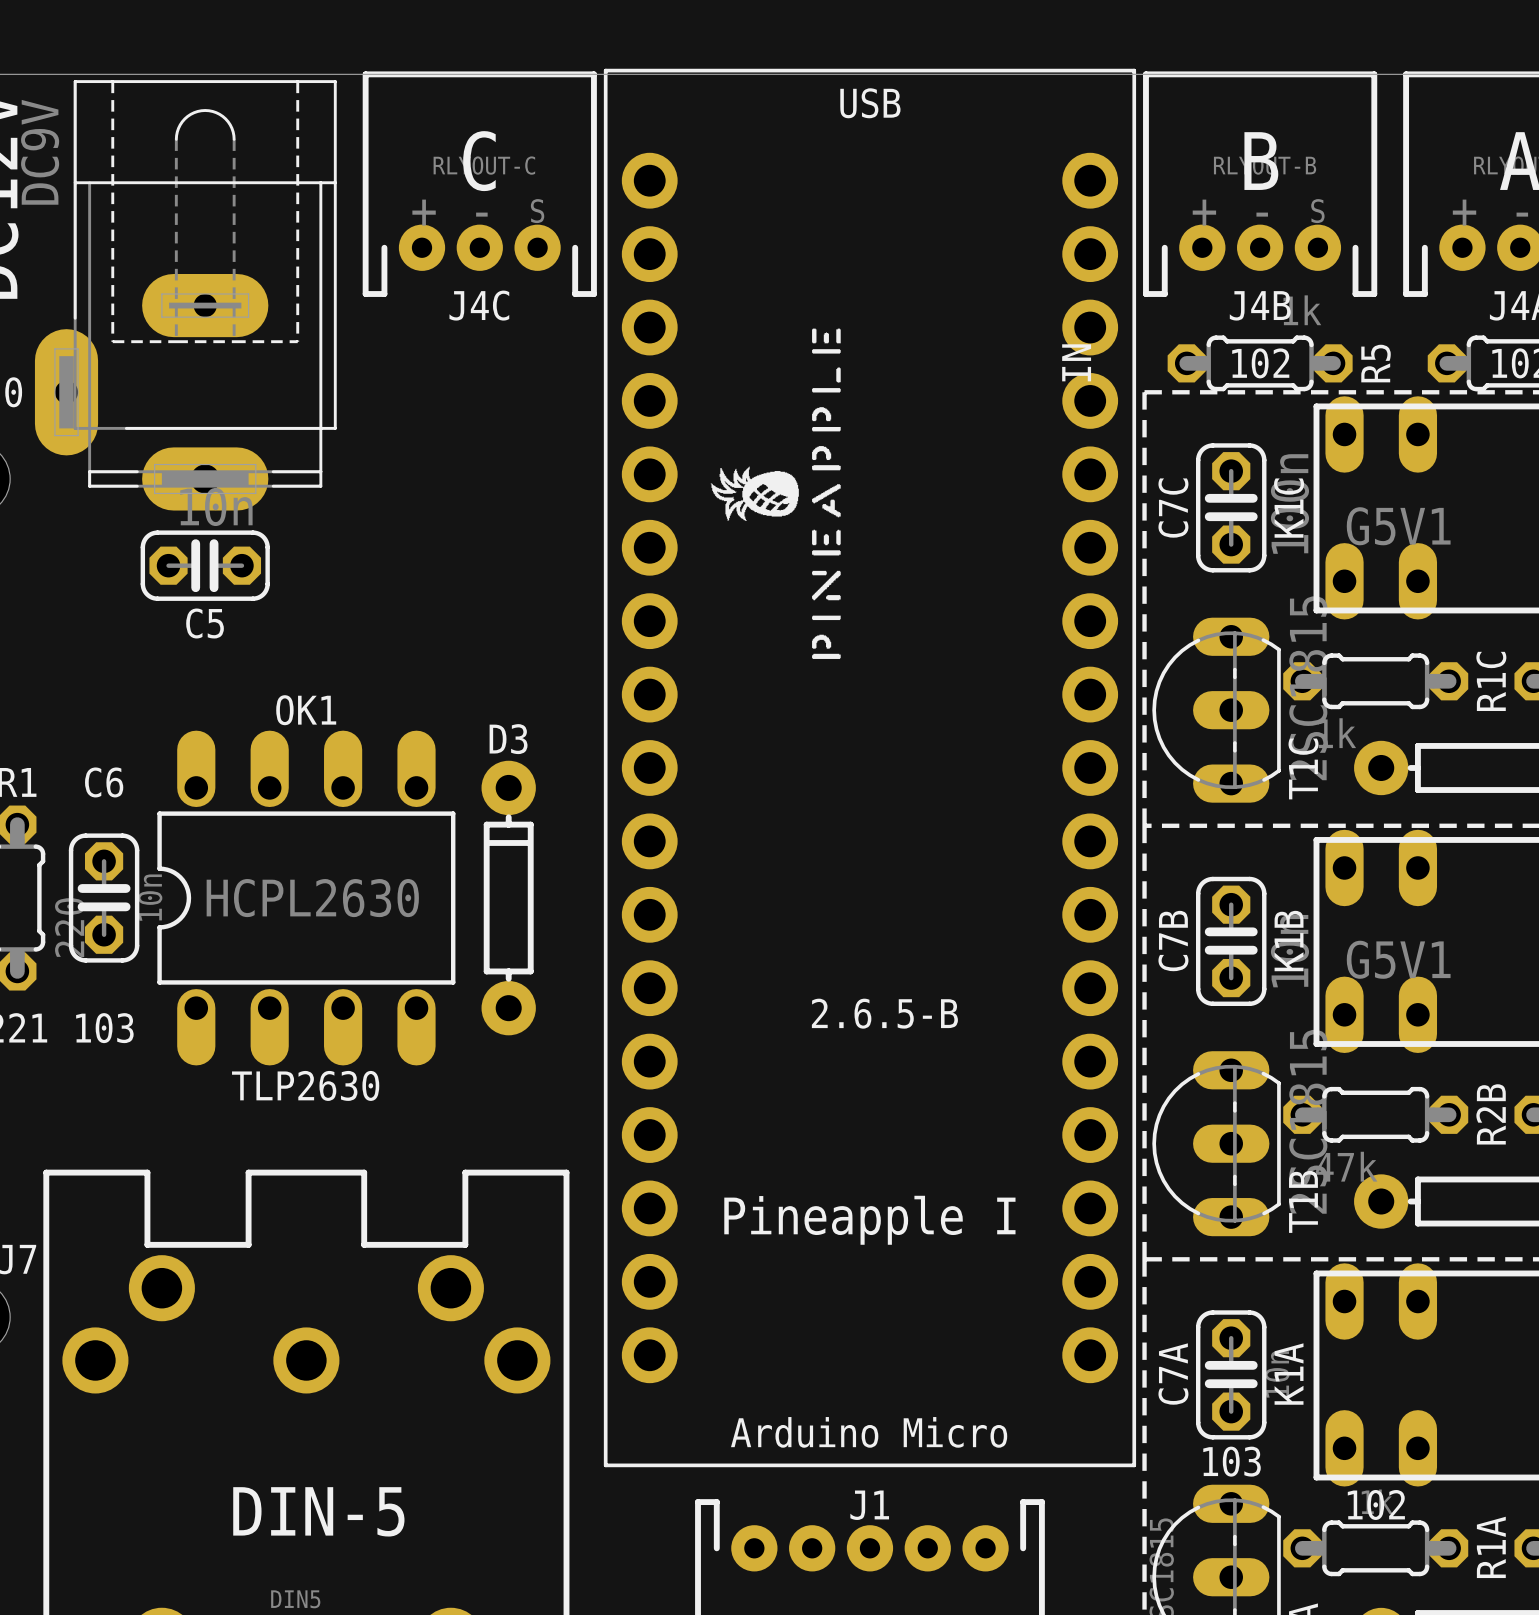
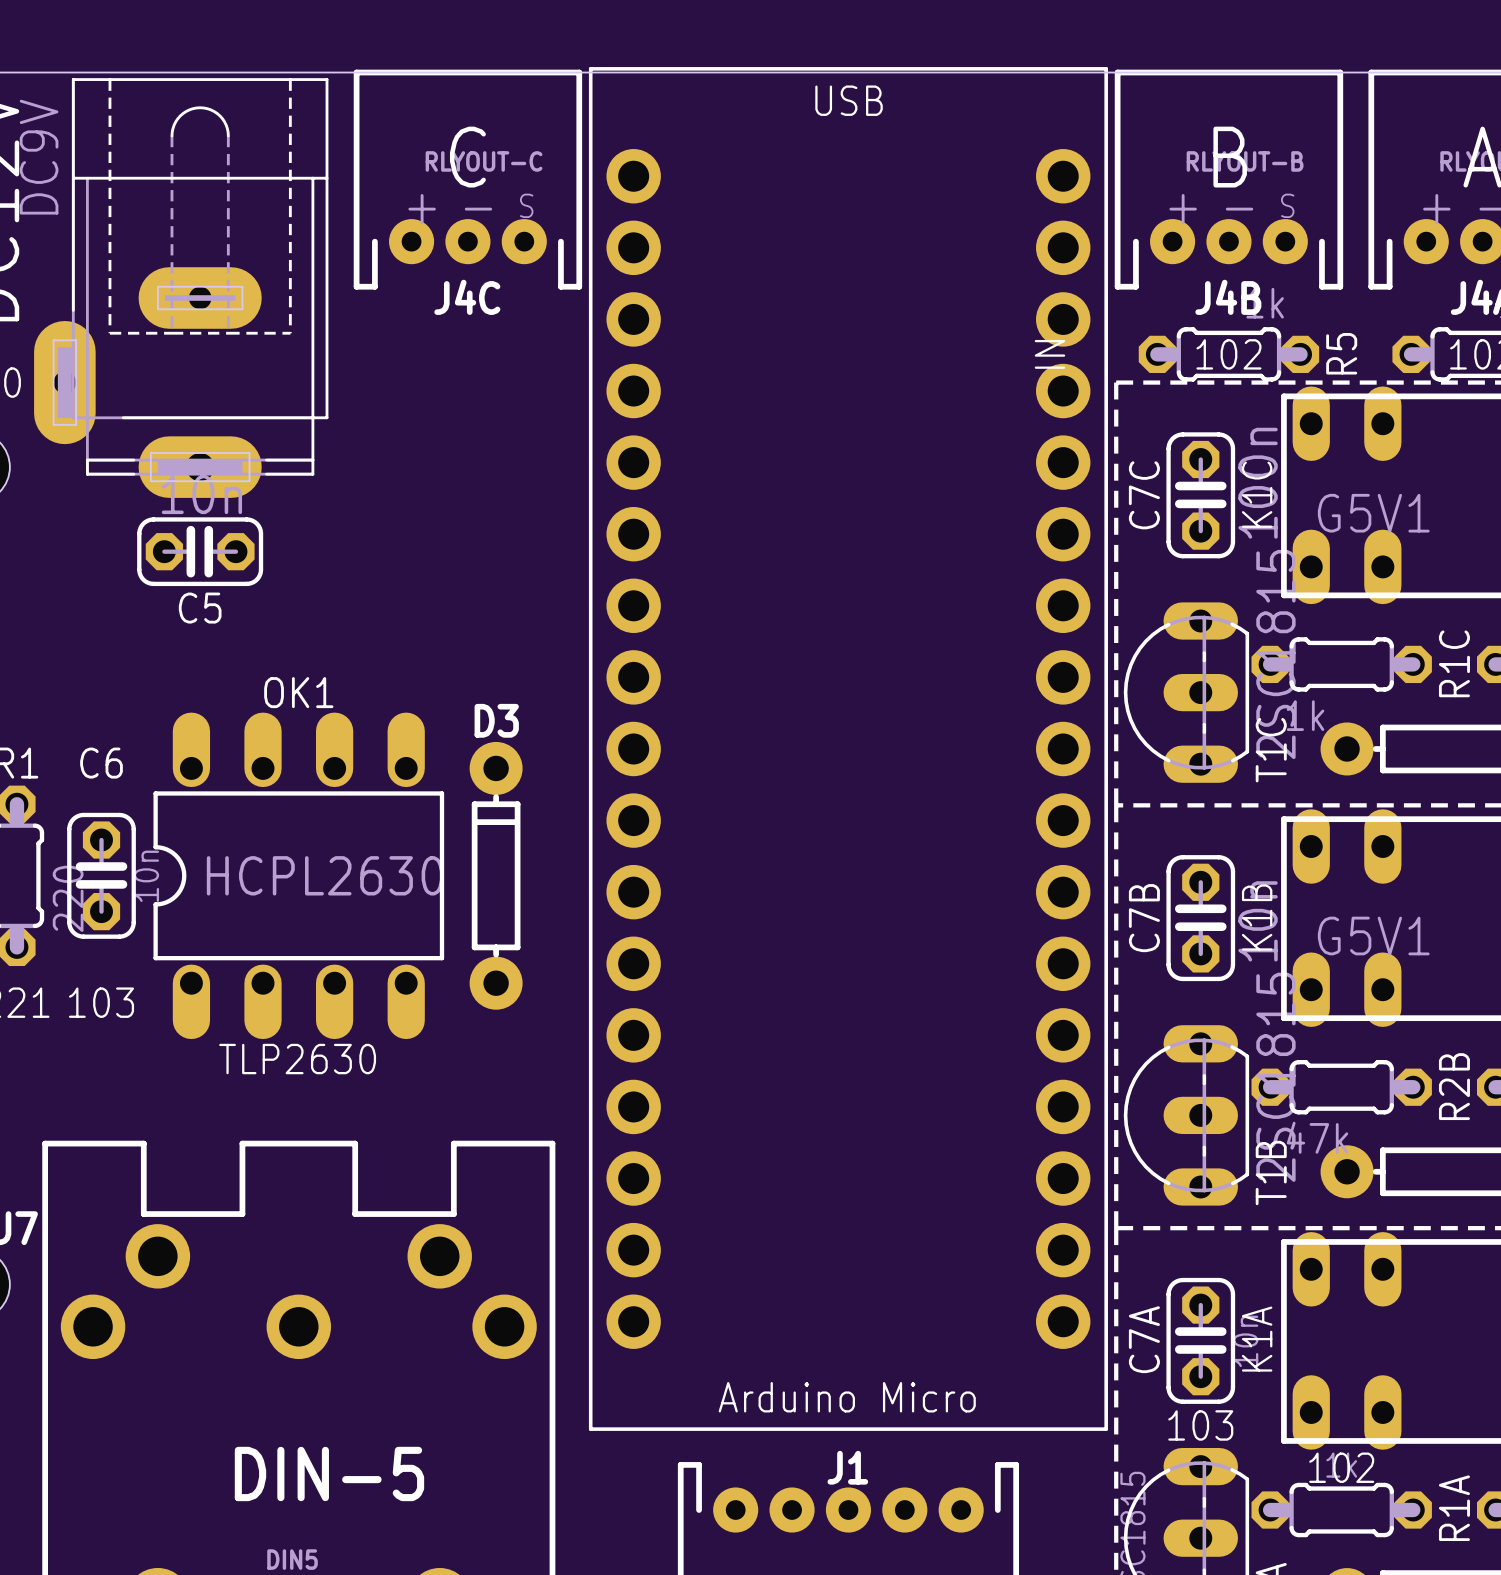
drawing: [710, 328, 841, 659] -> none
text: 2.6.5-B (884, 1013) -> none
text: Pineapple I (869, 1220) -> none

